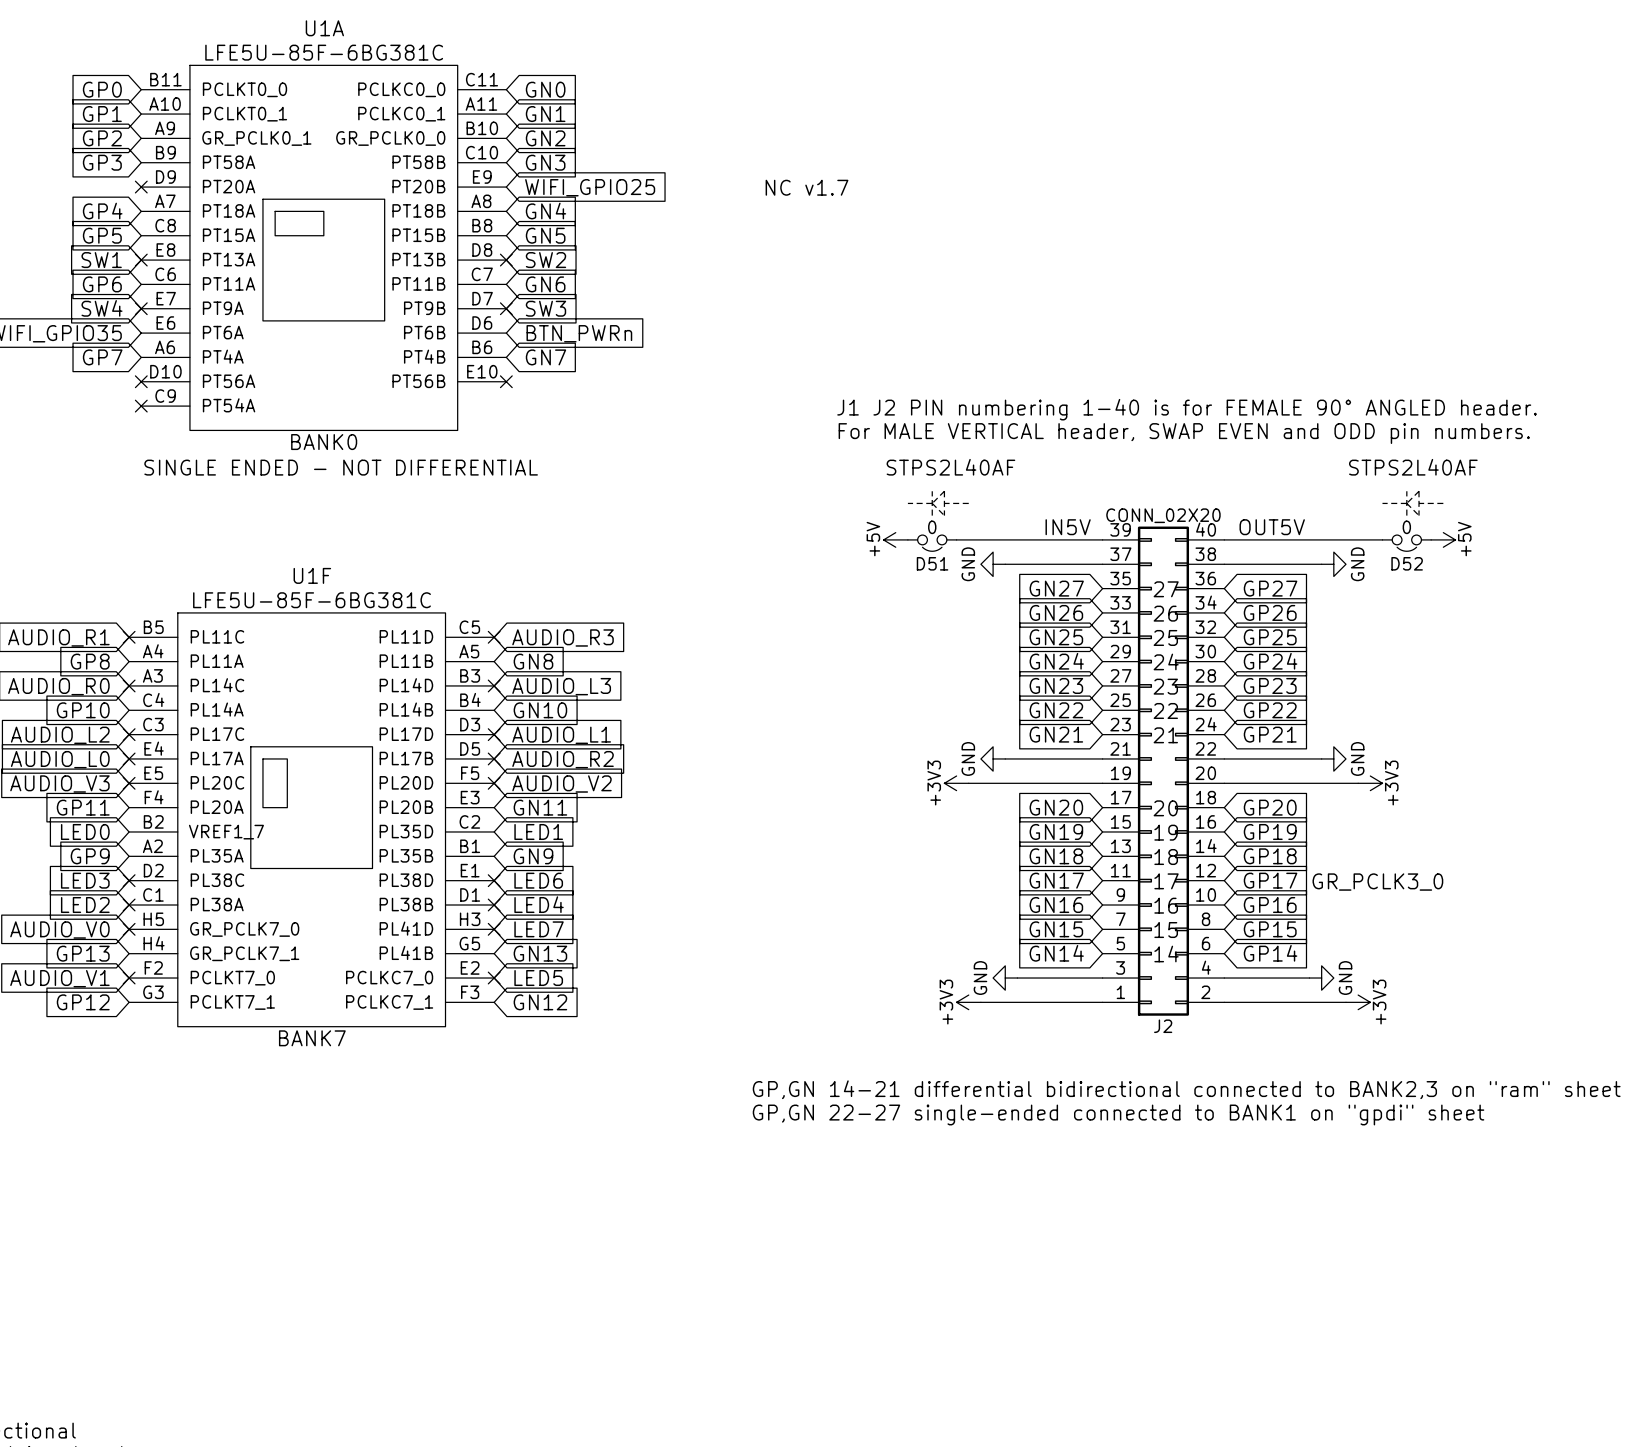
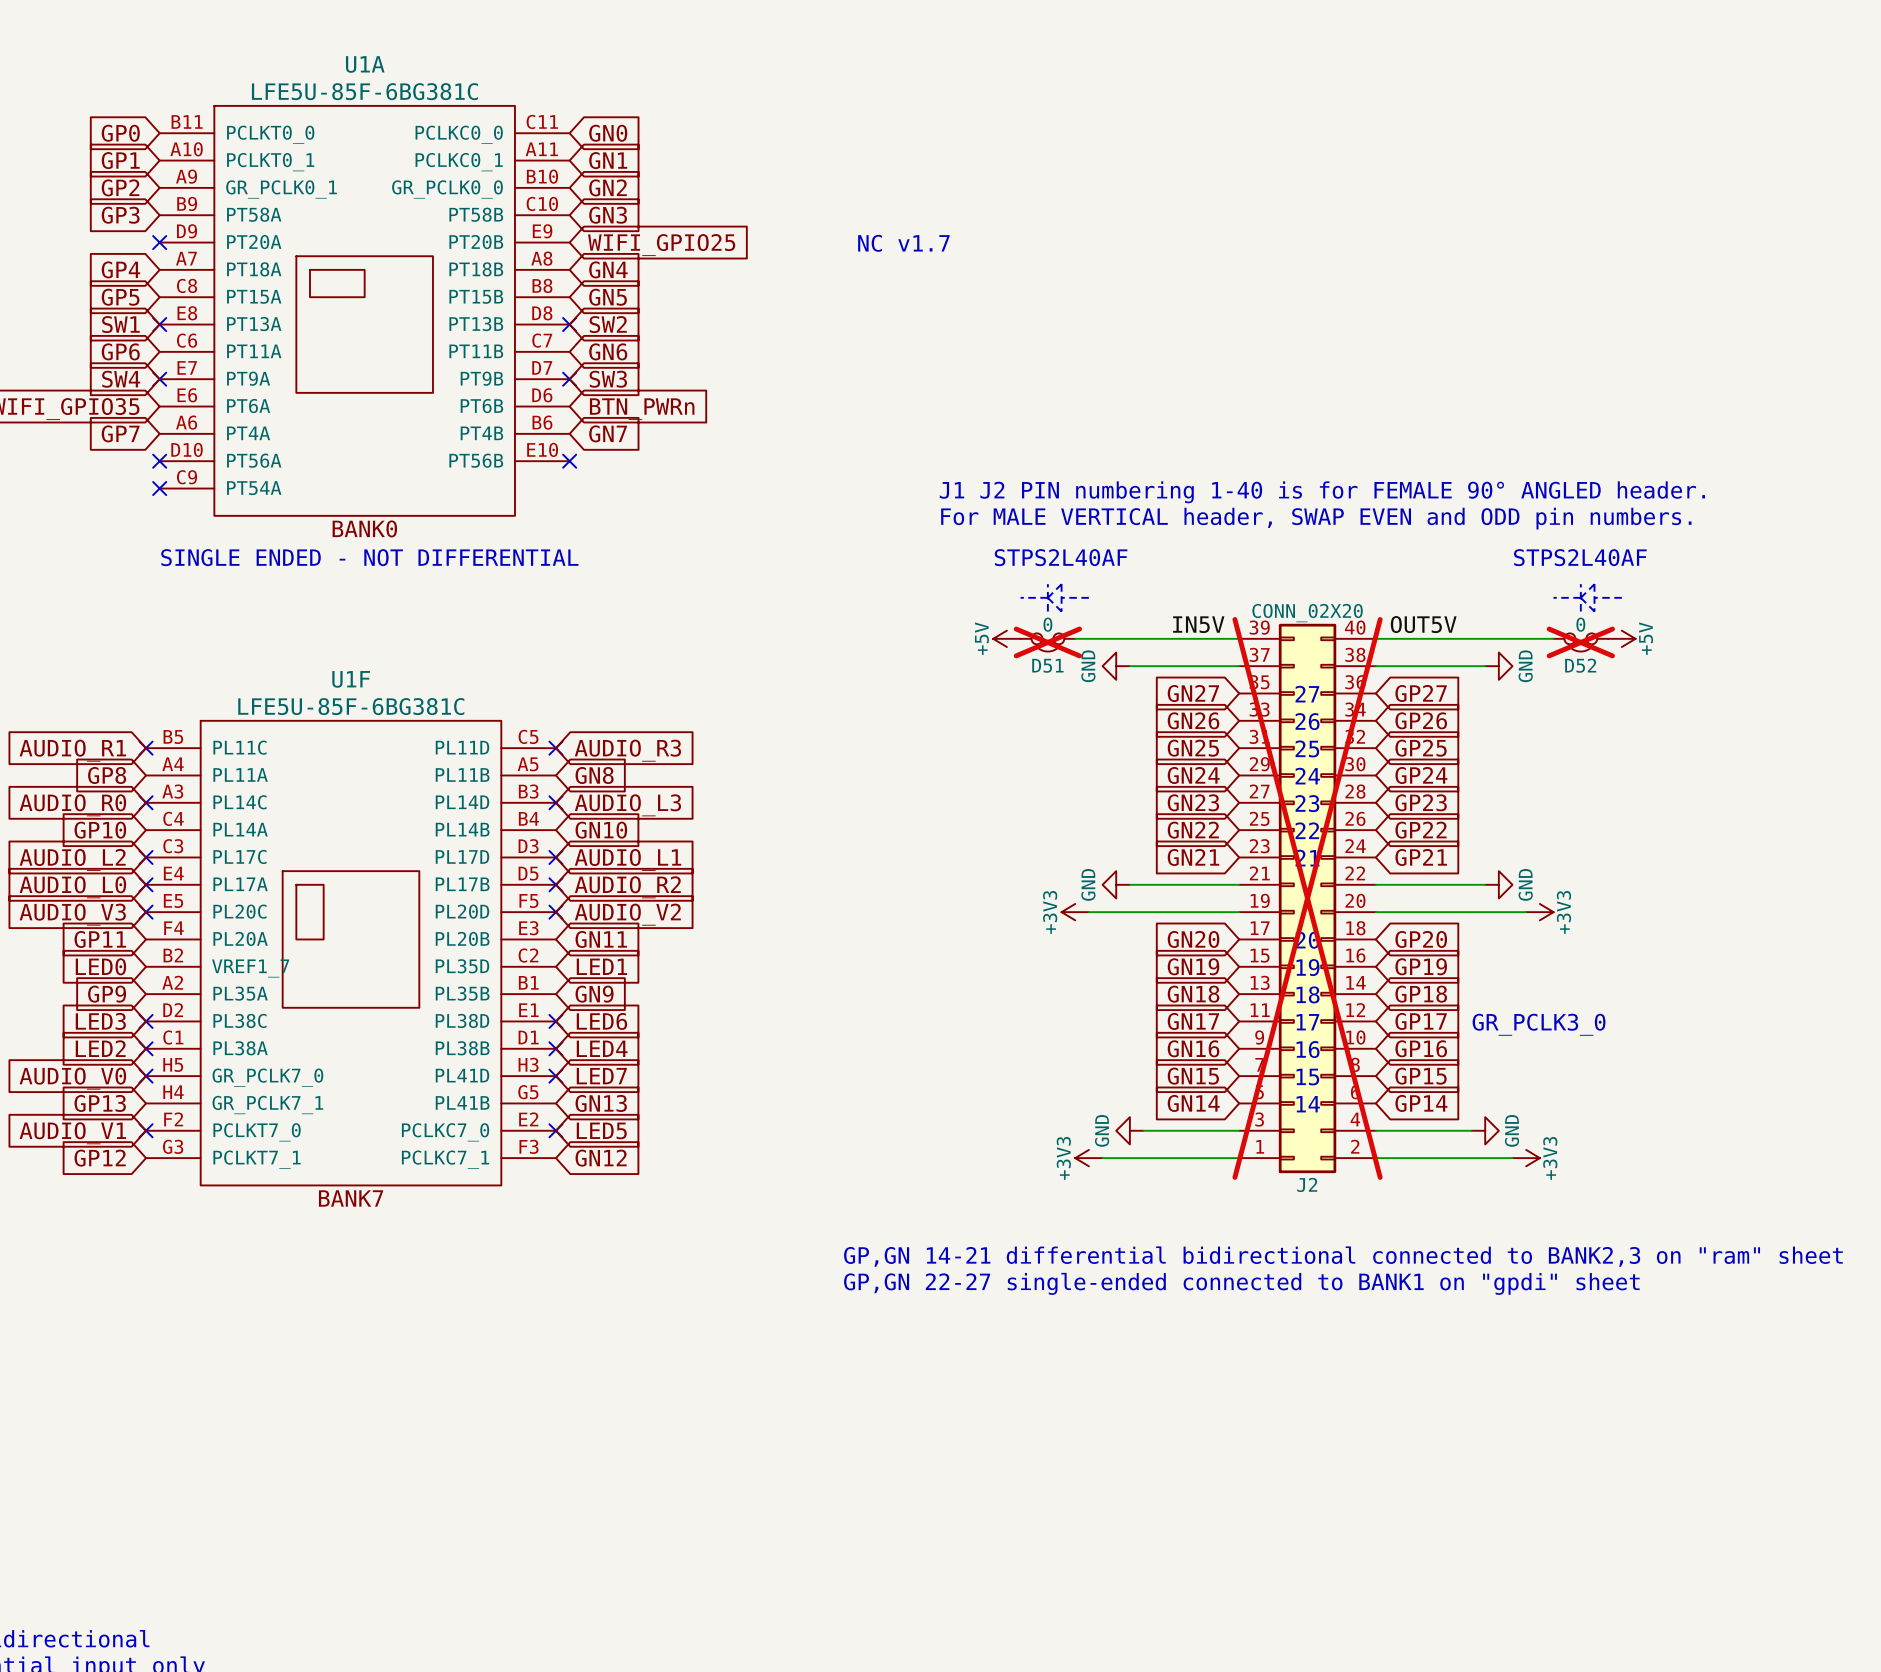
D51 do-not-place cross: none -> (1047, 642)
D52 do-not-place cross: none -> (1580, 642)
J2 do-not-place cross: none -> (1307, 898)

